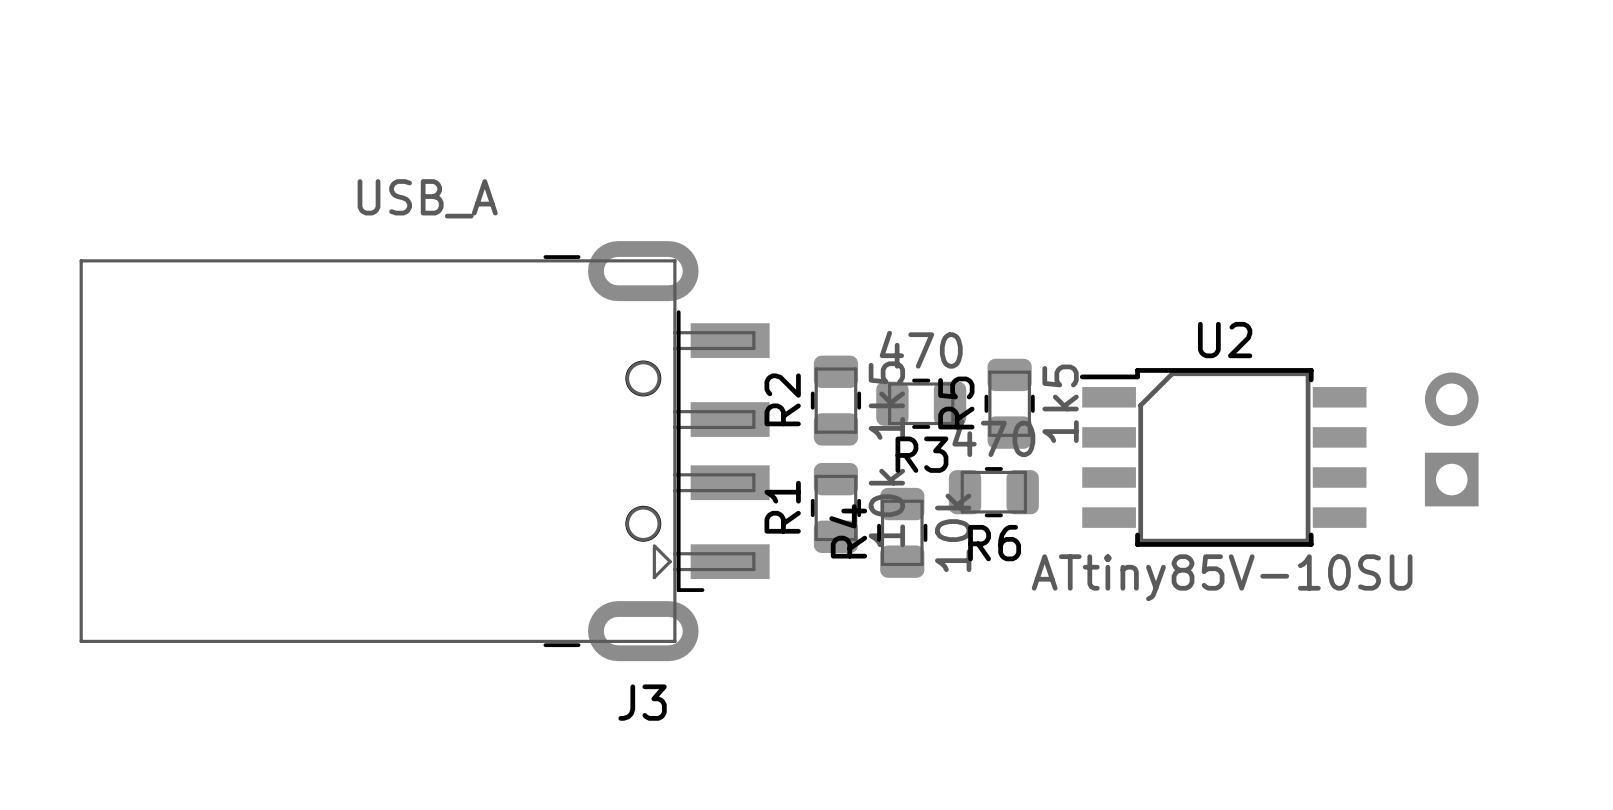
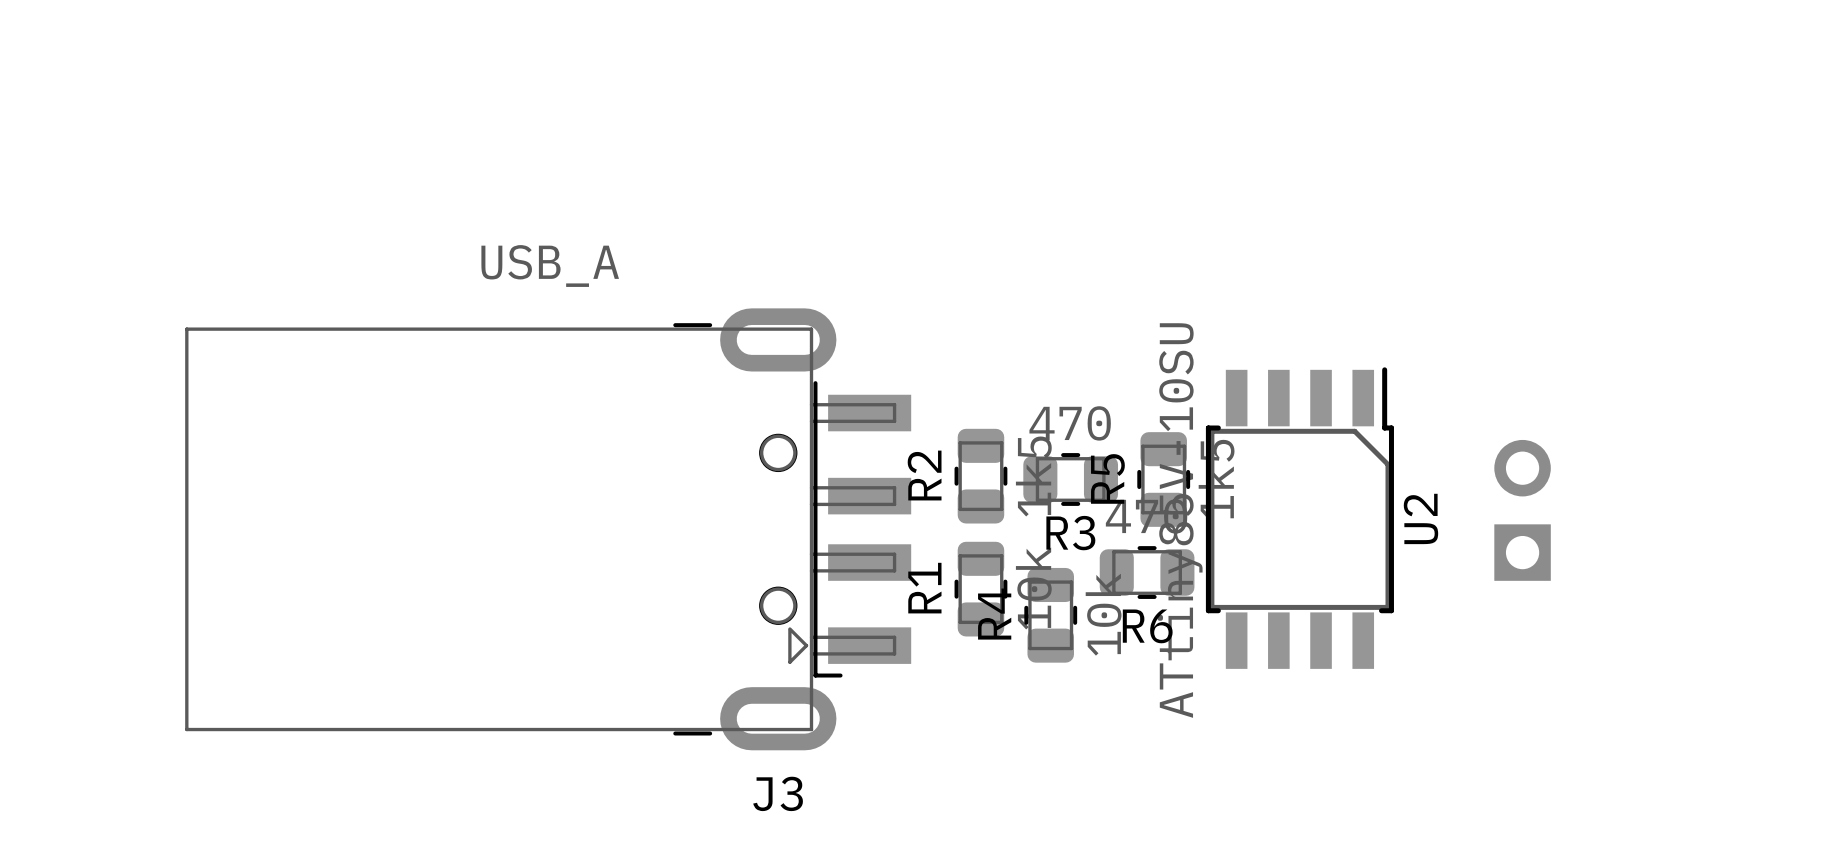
part position: (1451, 439) -> (1522, 510)
U2 rotation: 0° (1223, 457) -> 90° clockwise (1299, 518)

